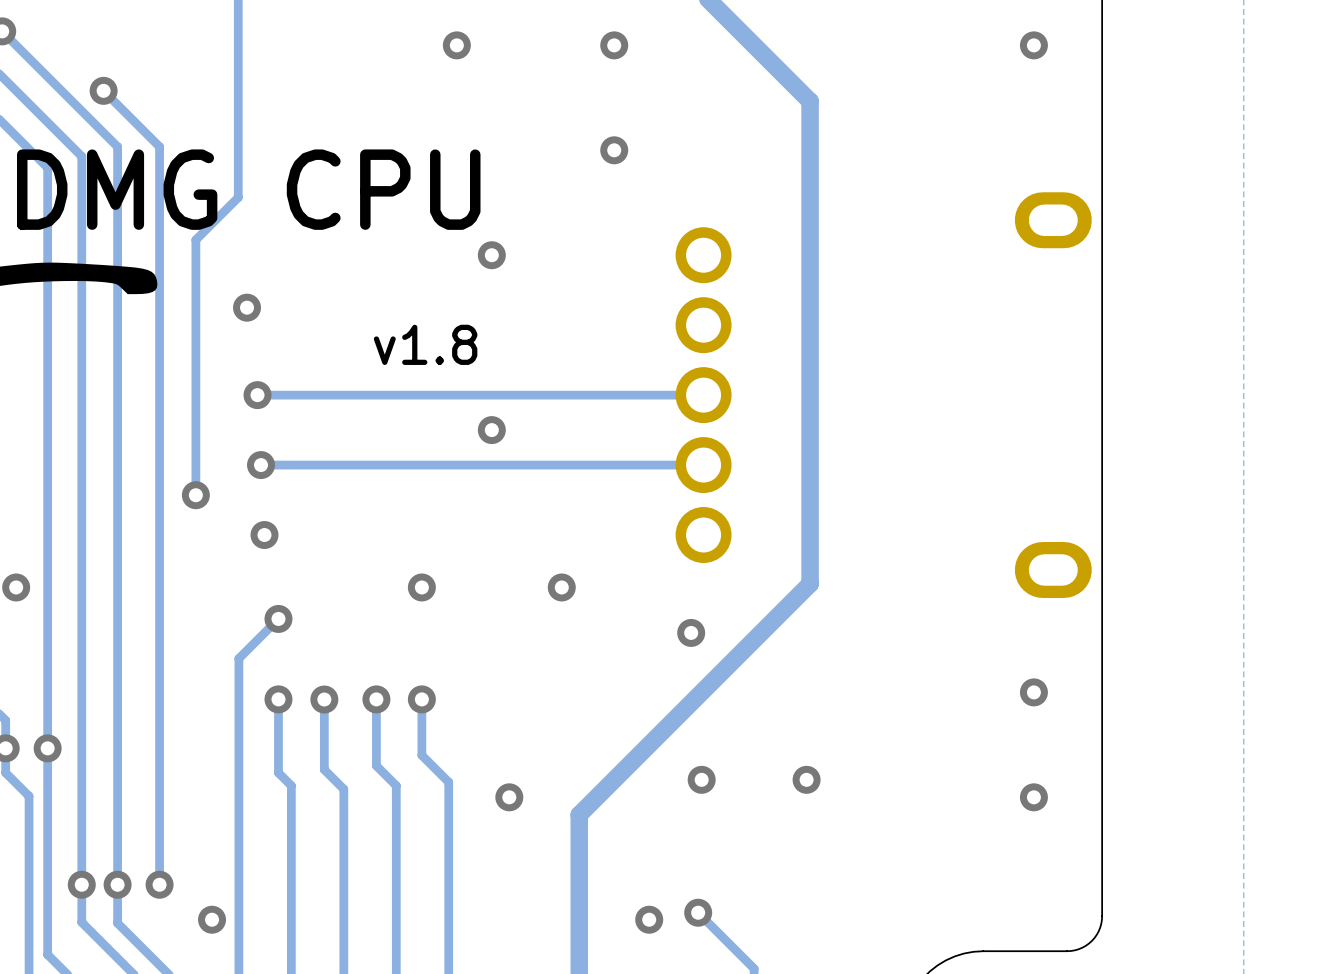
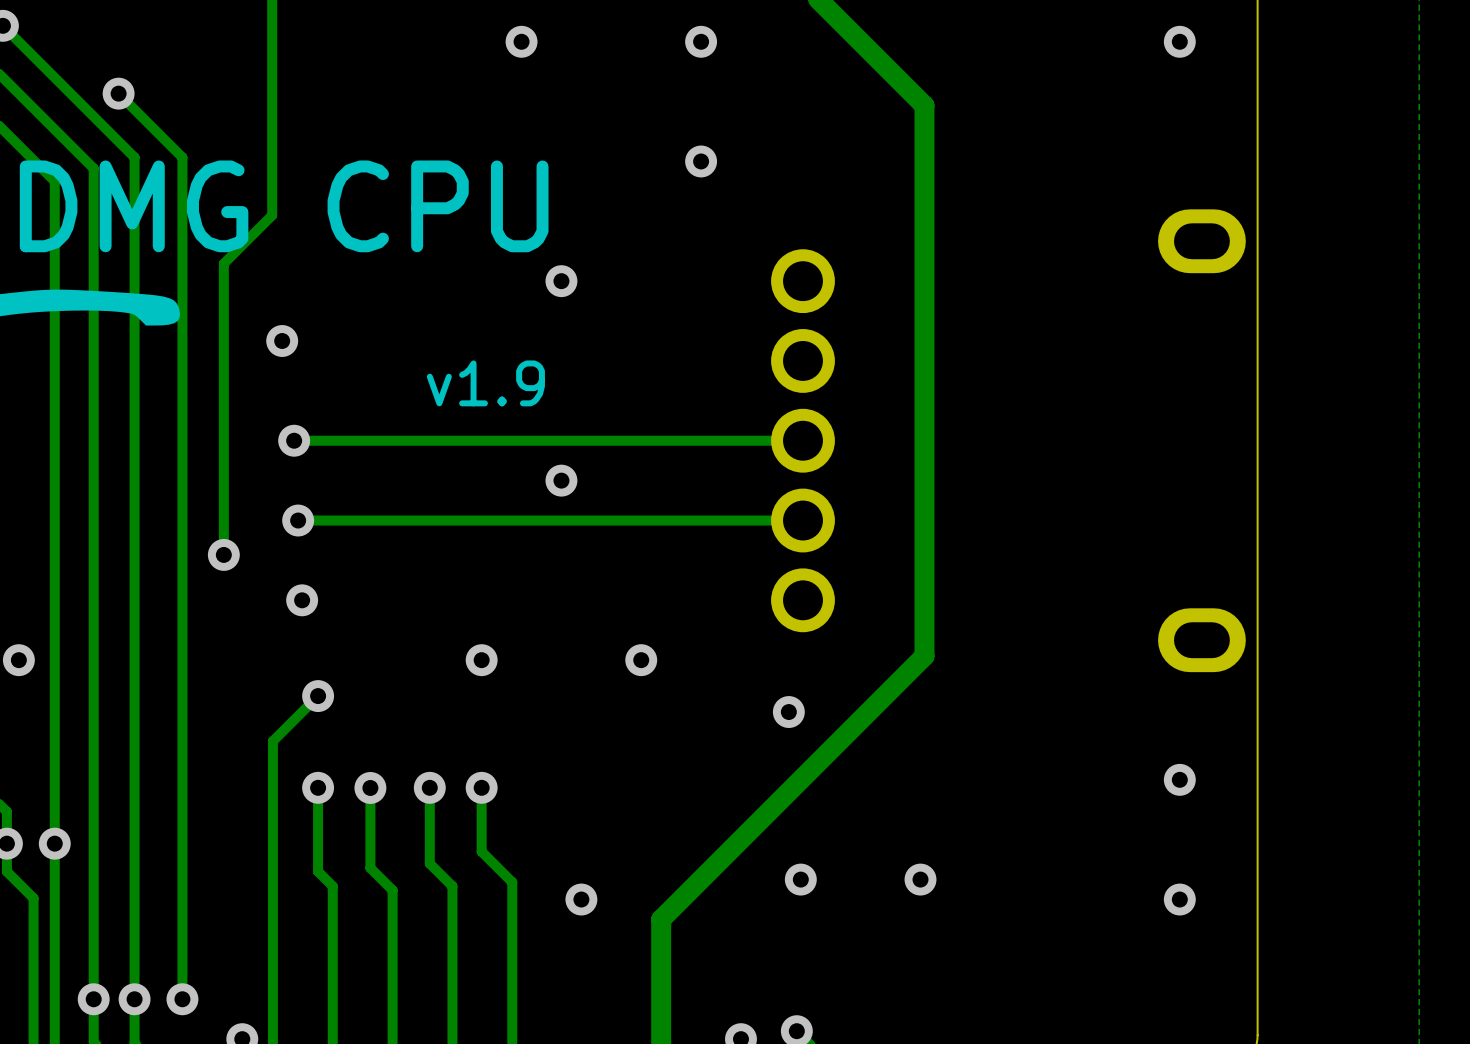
text: v1.8 (425, 344) -> v1.9 (485, 383)

